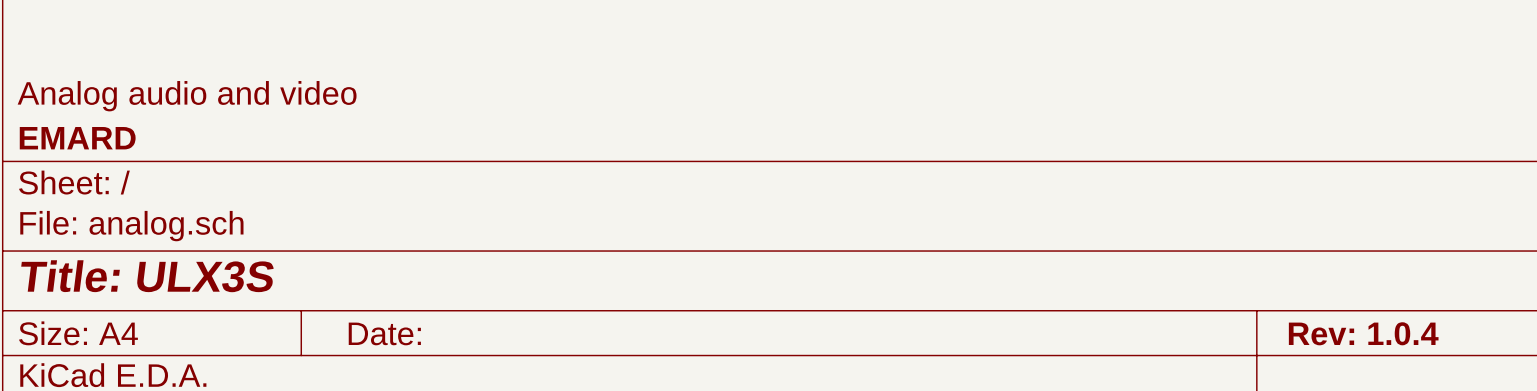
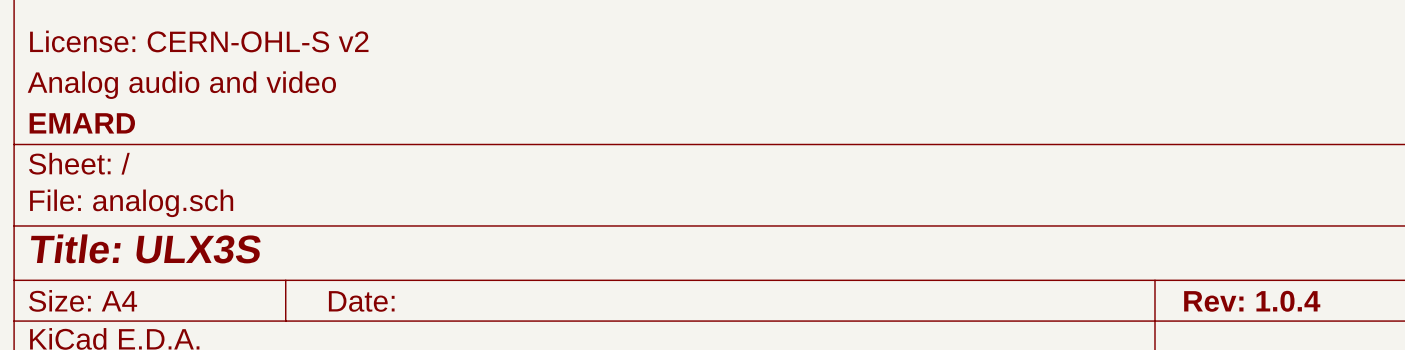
title block: none -> License: CERN-OHL-S v2 (199, 41)

